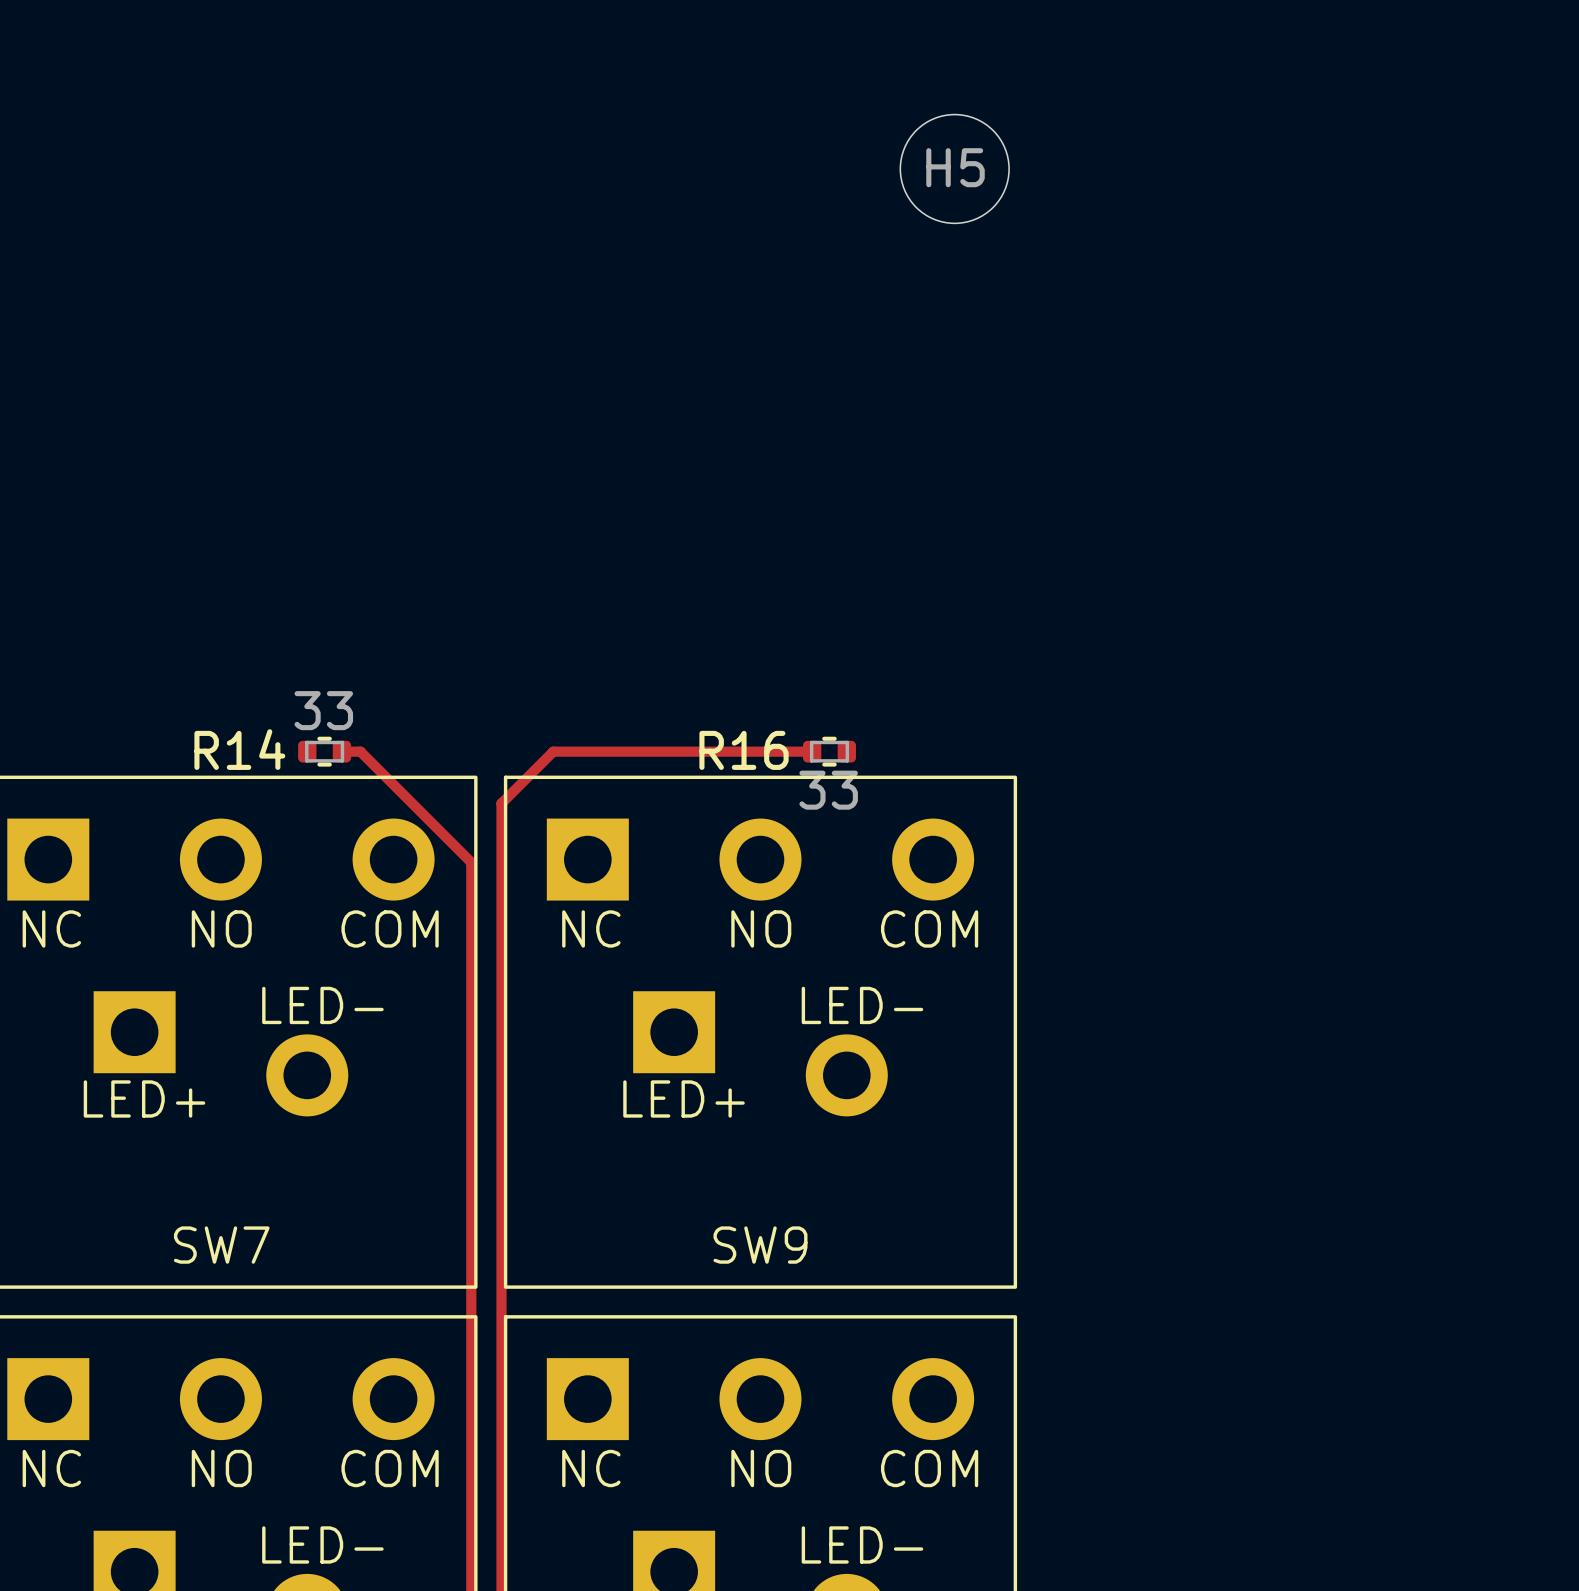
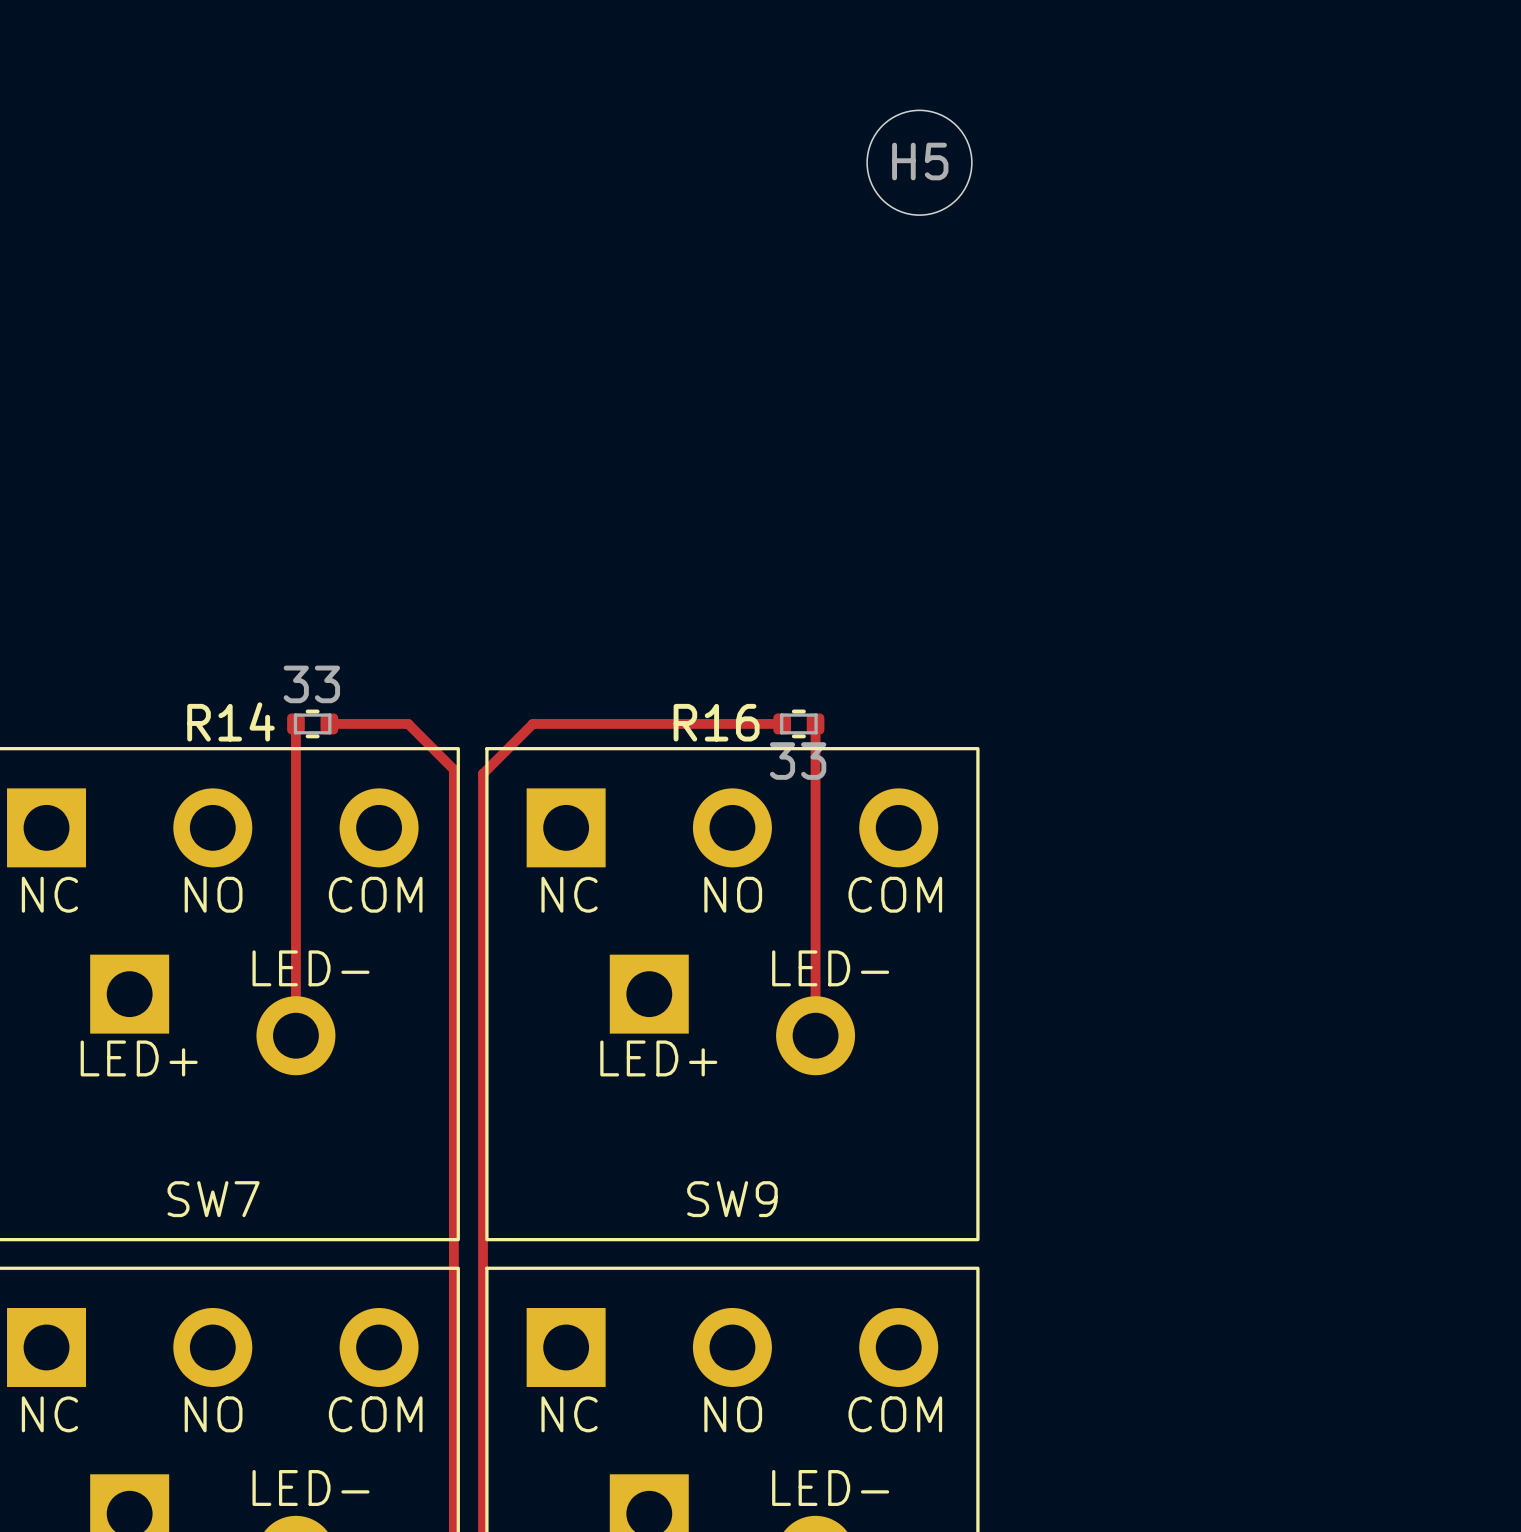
track: none -> (295, 723) (295, 1035)
track: (360, 751) (471, 862) -> (347, 723) (408, 723) (453, 769) (453, 830)
track: none -> (815, 723) (815, 1035)

